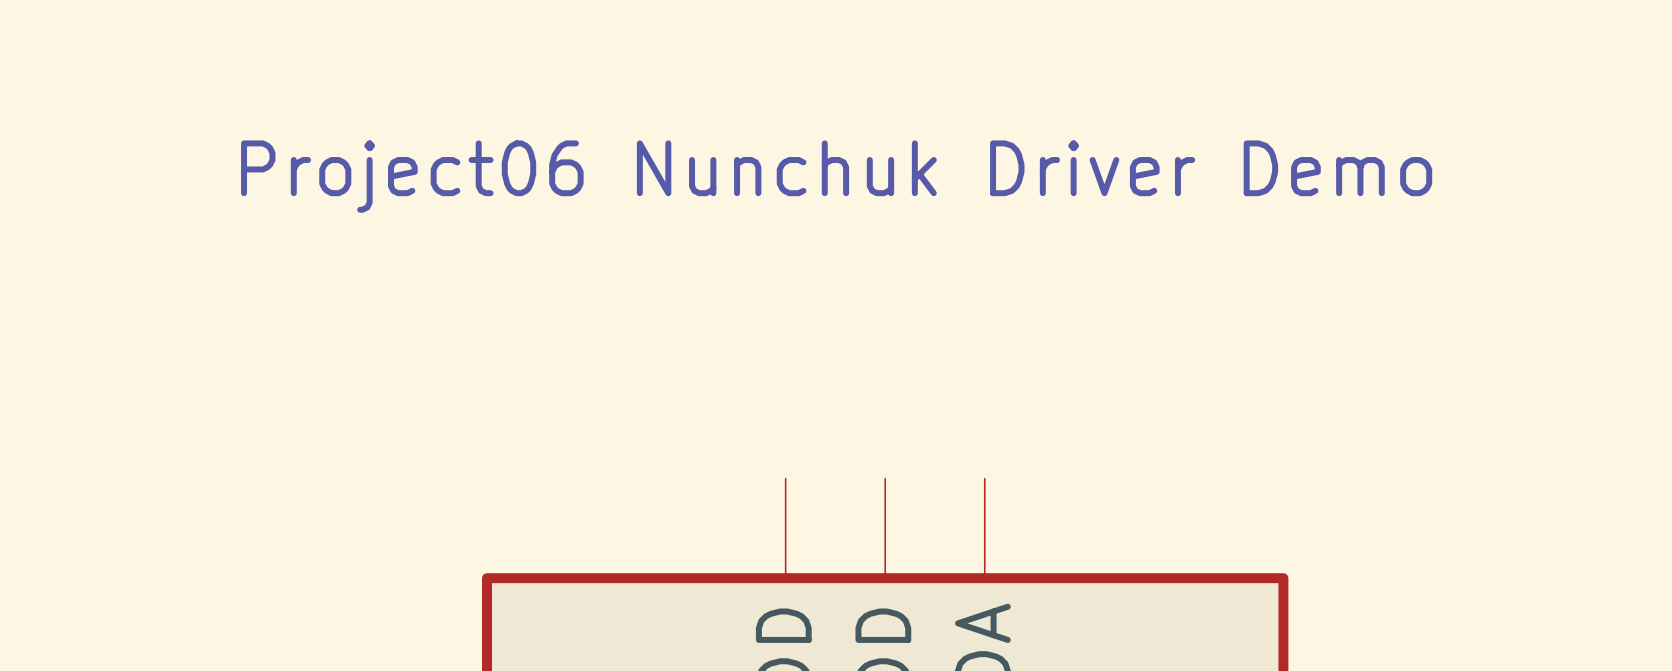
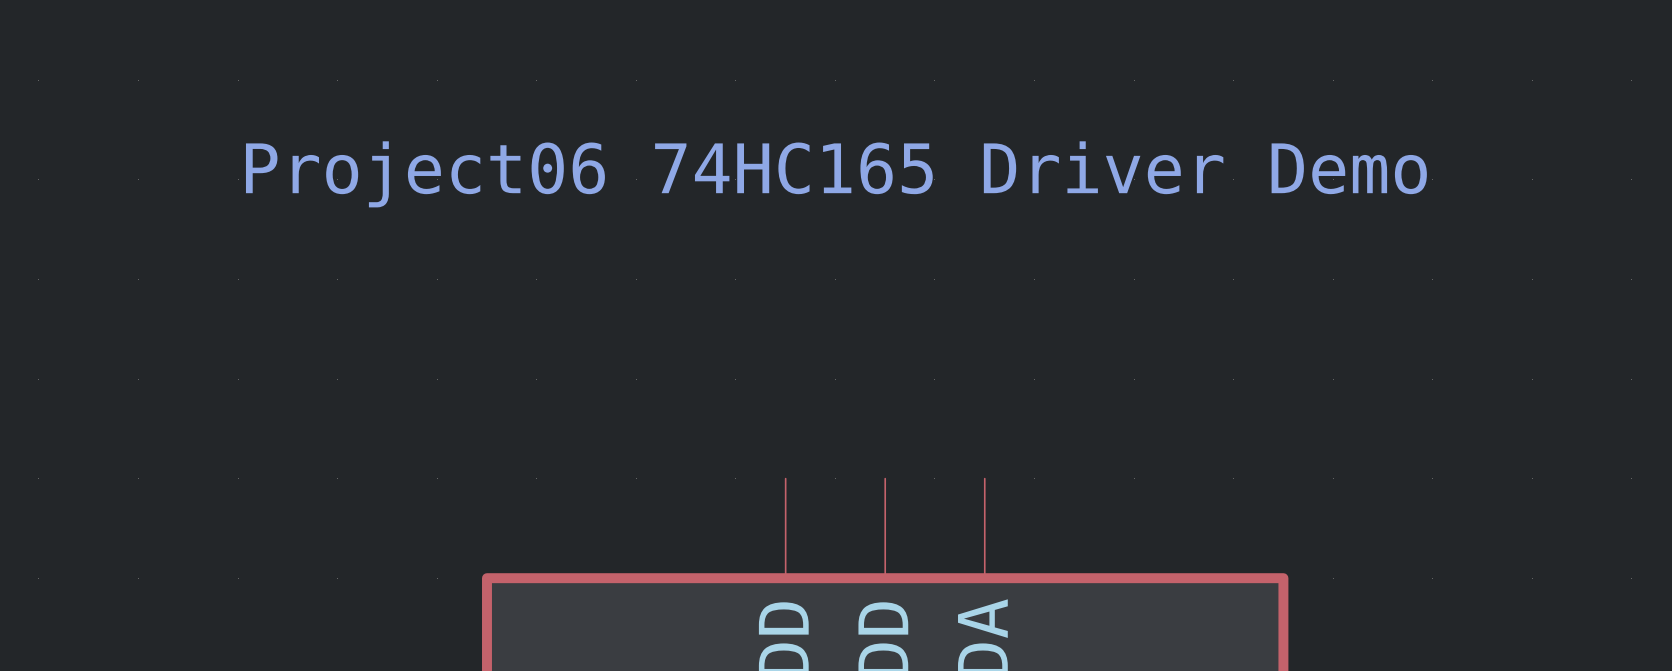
text: Project06 Nunchuk Driver Demo (836, 176) -> Project06 74HC165 Driver Demo (836, 174)

